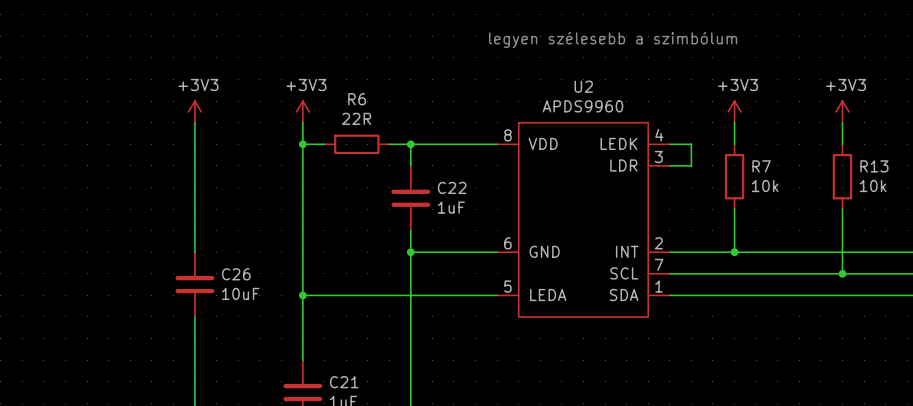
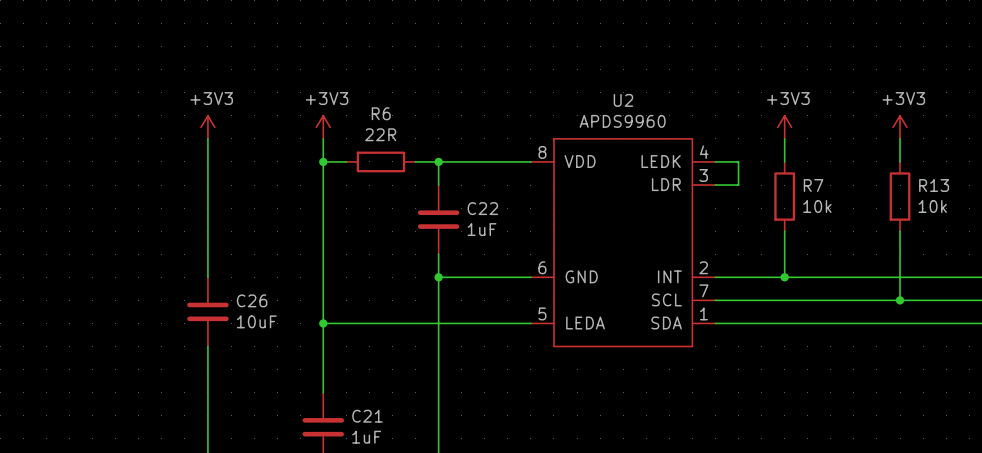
text: legyen szélesebb a szimbólum (613, 39) -> none

